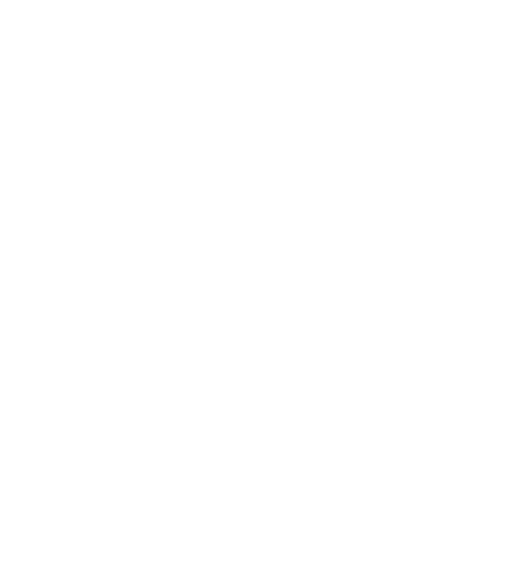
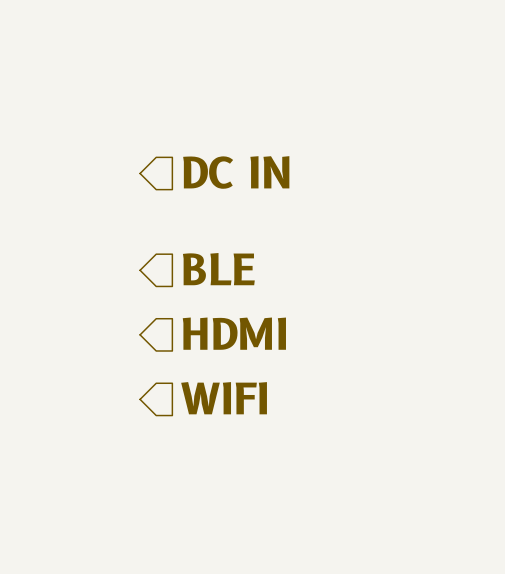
hierarchical label: none -> DC IN (236, 172)
hierarchical label: none -> BLE (218, 269)
hierarchical label: none -> HDMI (234, 333)
hierarchical label: none -> WIFI (224, 398)

